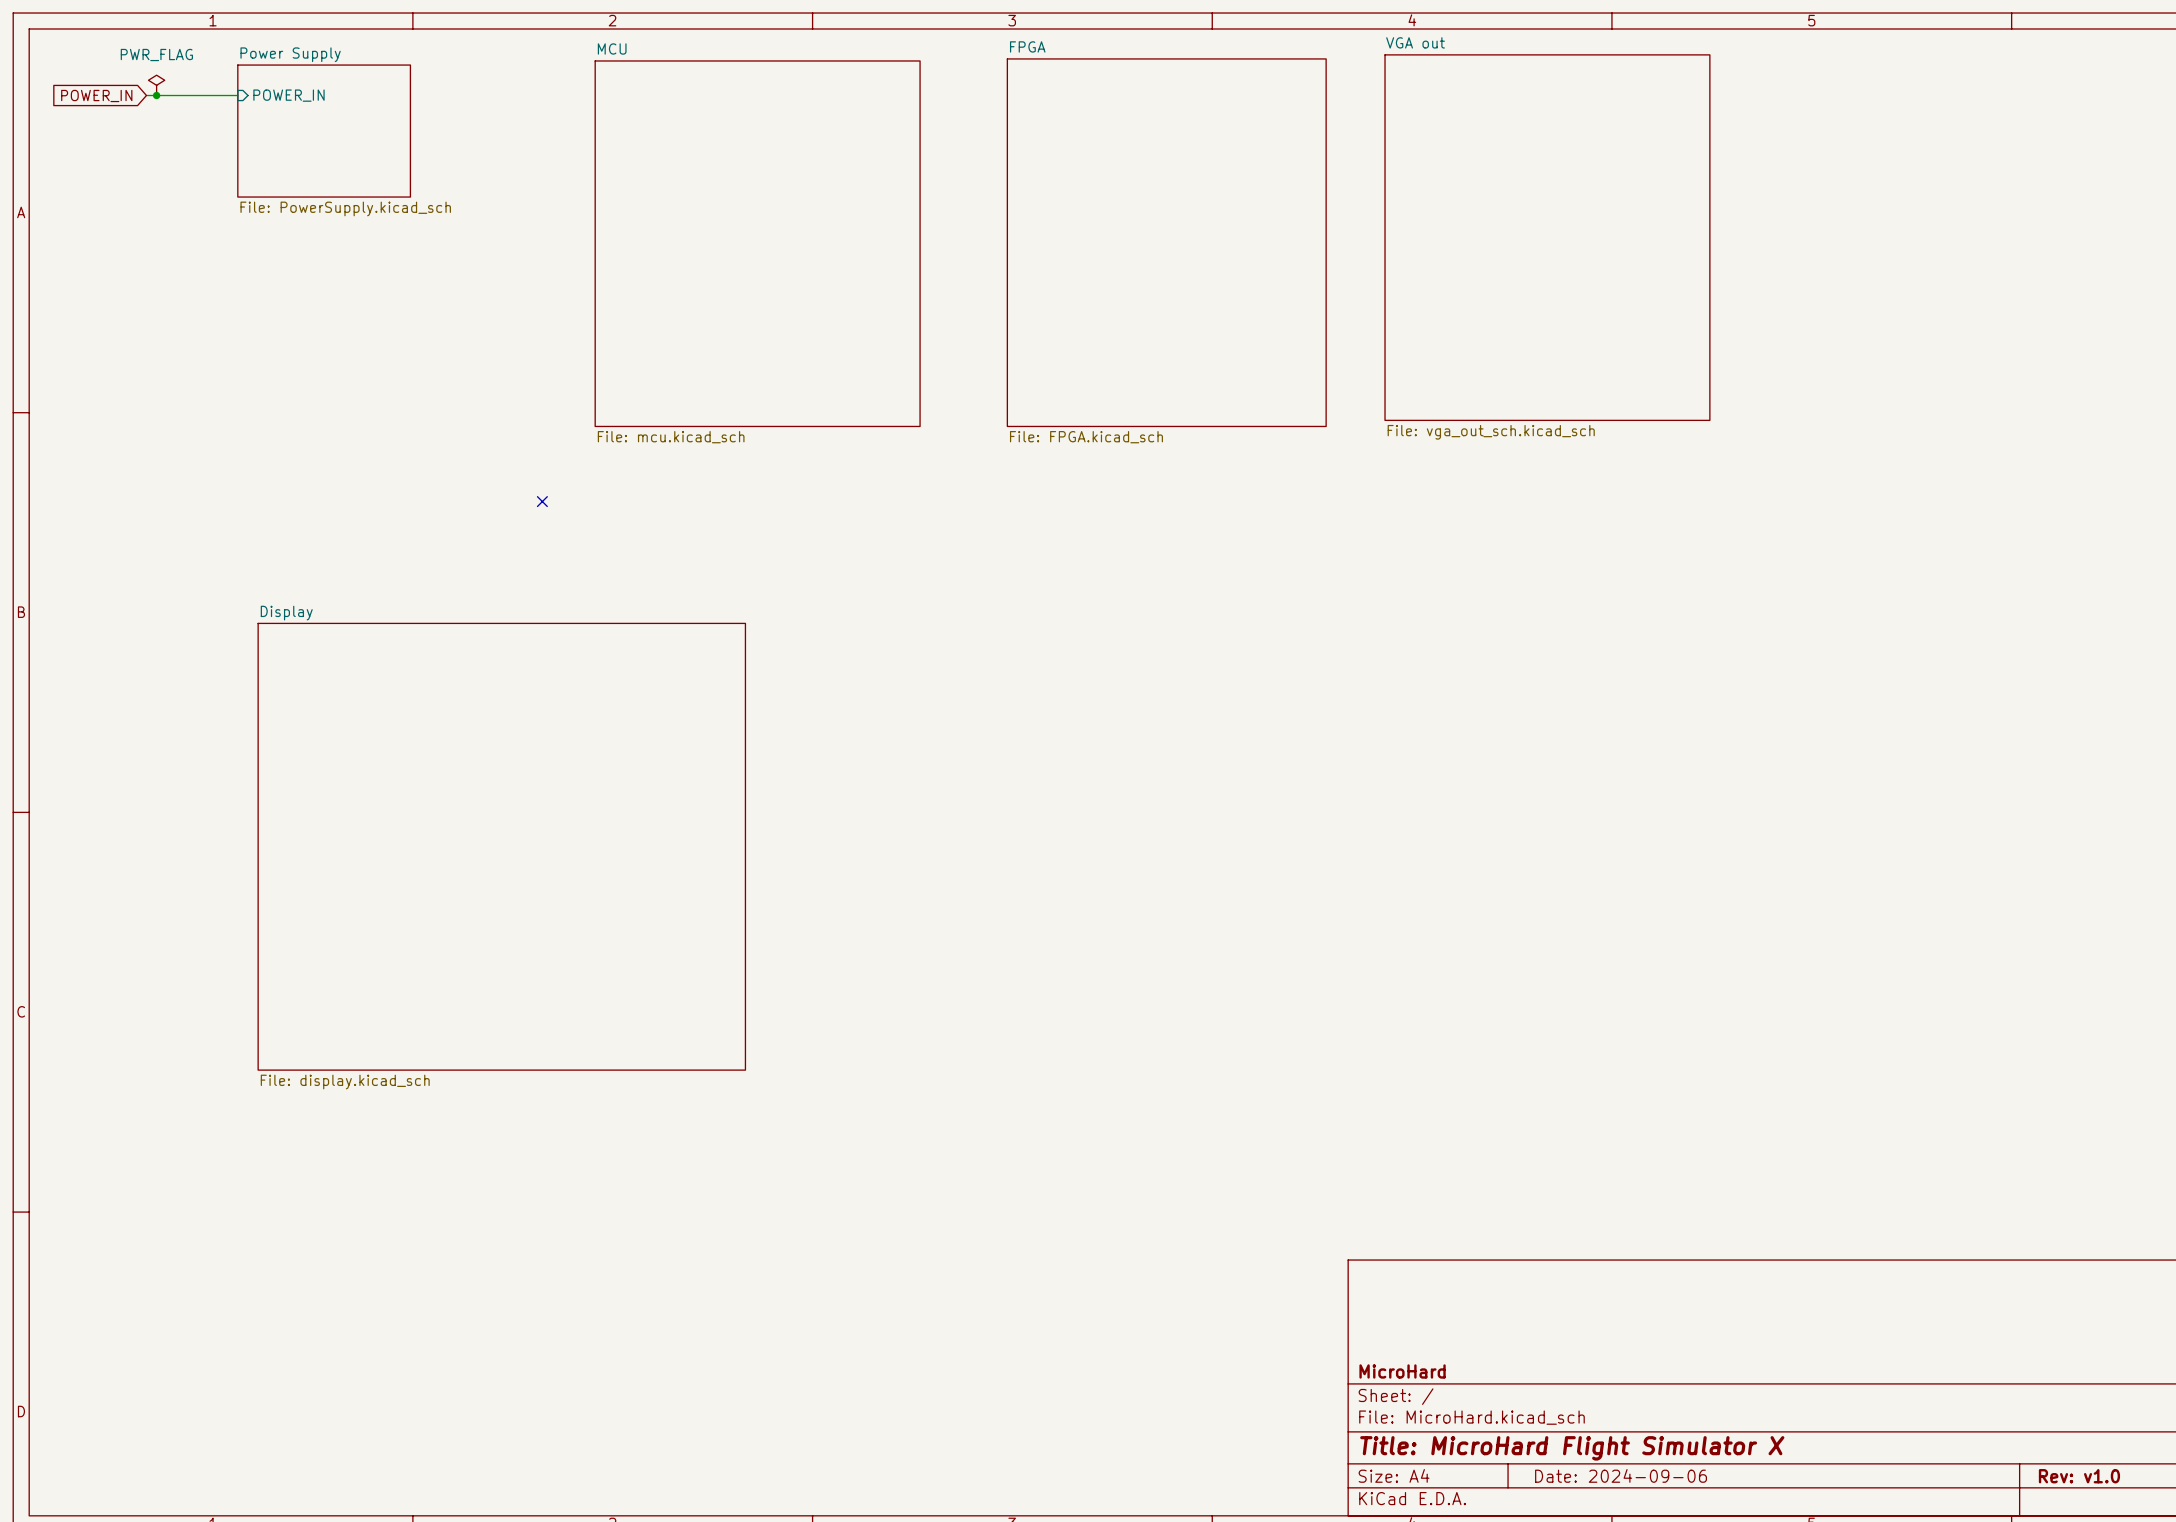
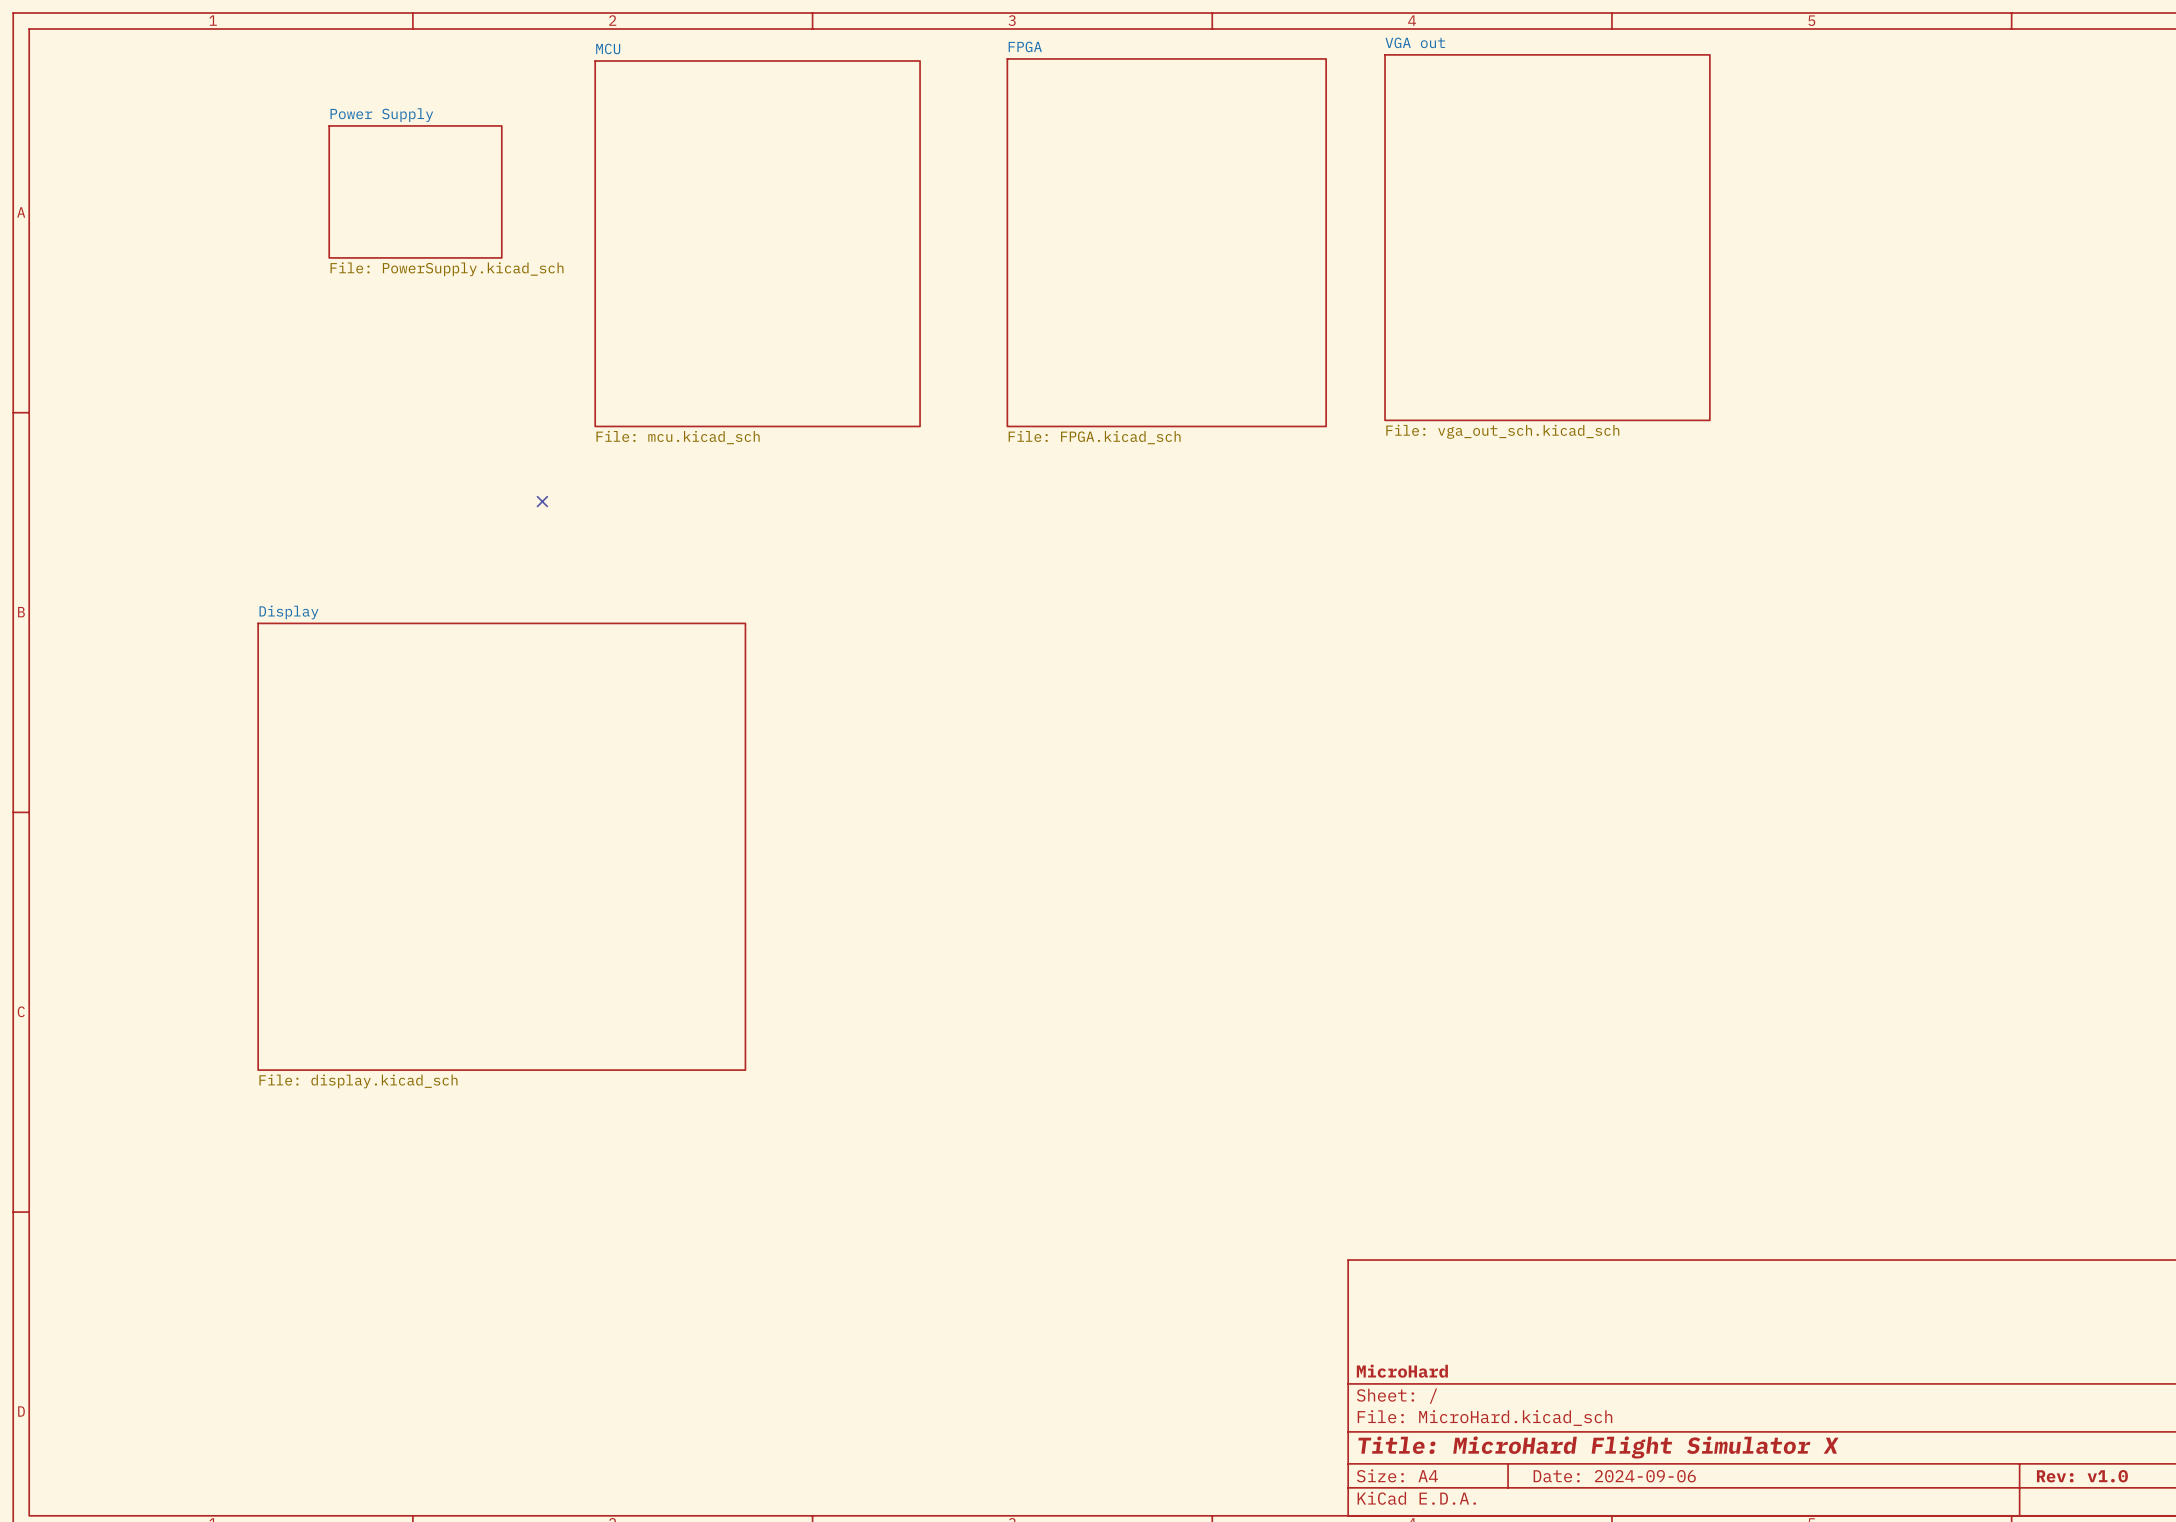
power symbol: PWR_FLAG (156, 85) -> none
global label: POWER_IN (96, 95) -> none
wire: (146, 95) (237, 95) -> none
junction: (156, 95) -> none
sheet pin: POWER_IN (288, 95) -> none
sheet Power Supply position: (324, 131) -> (415, 191)

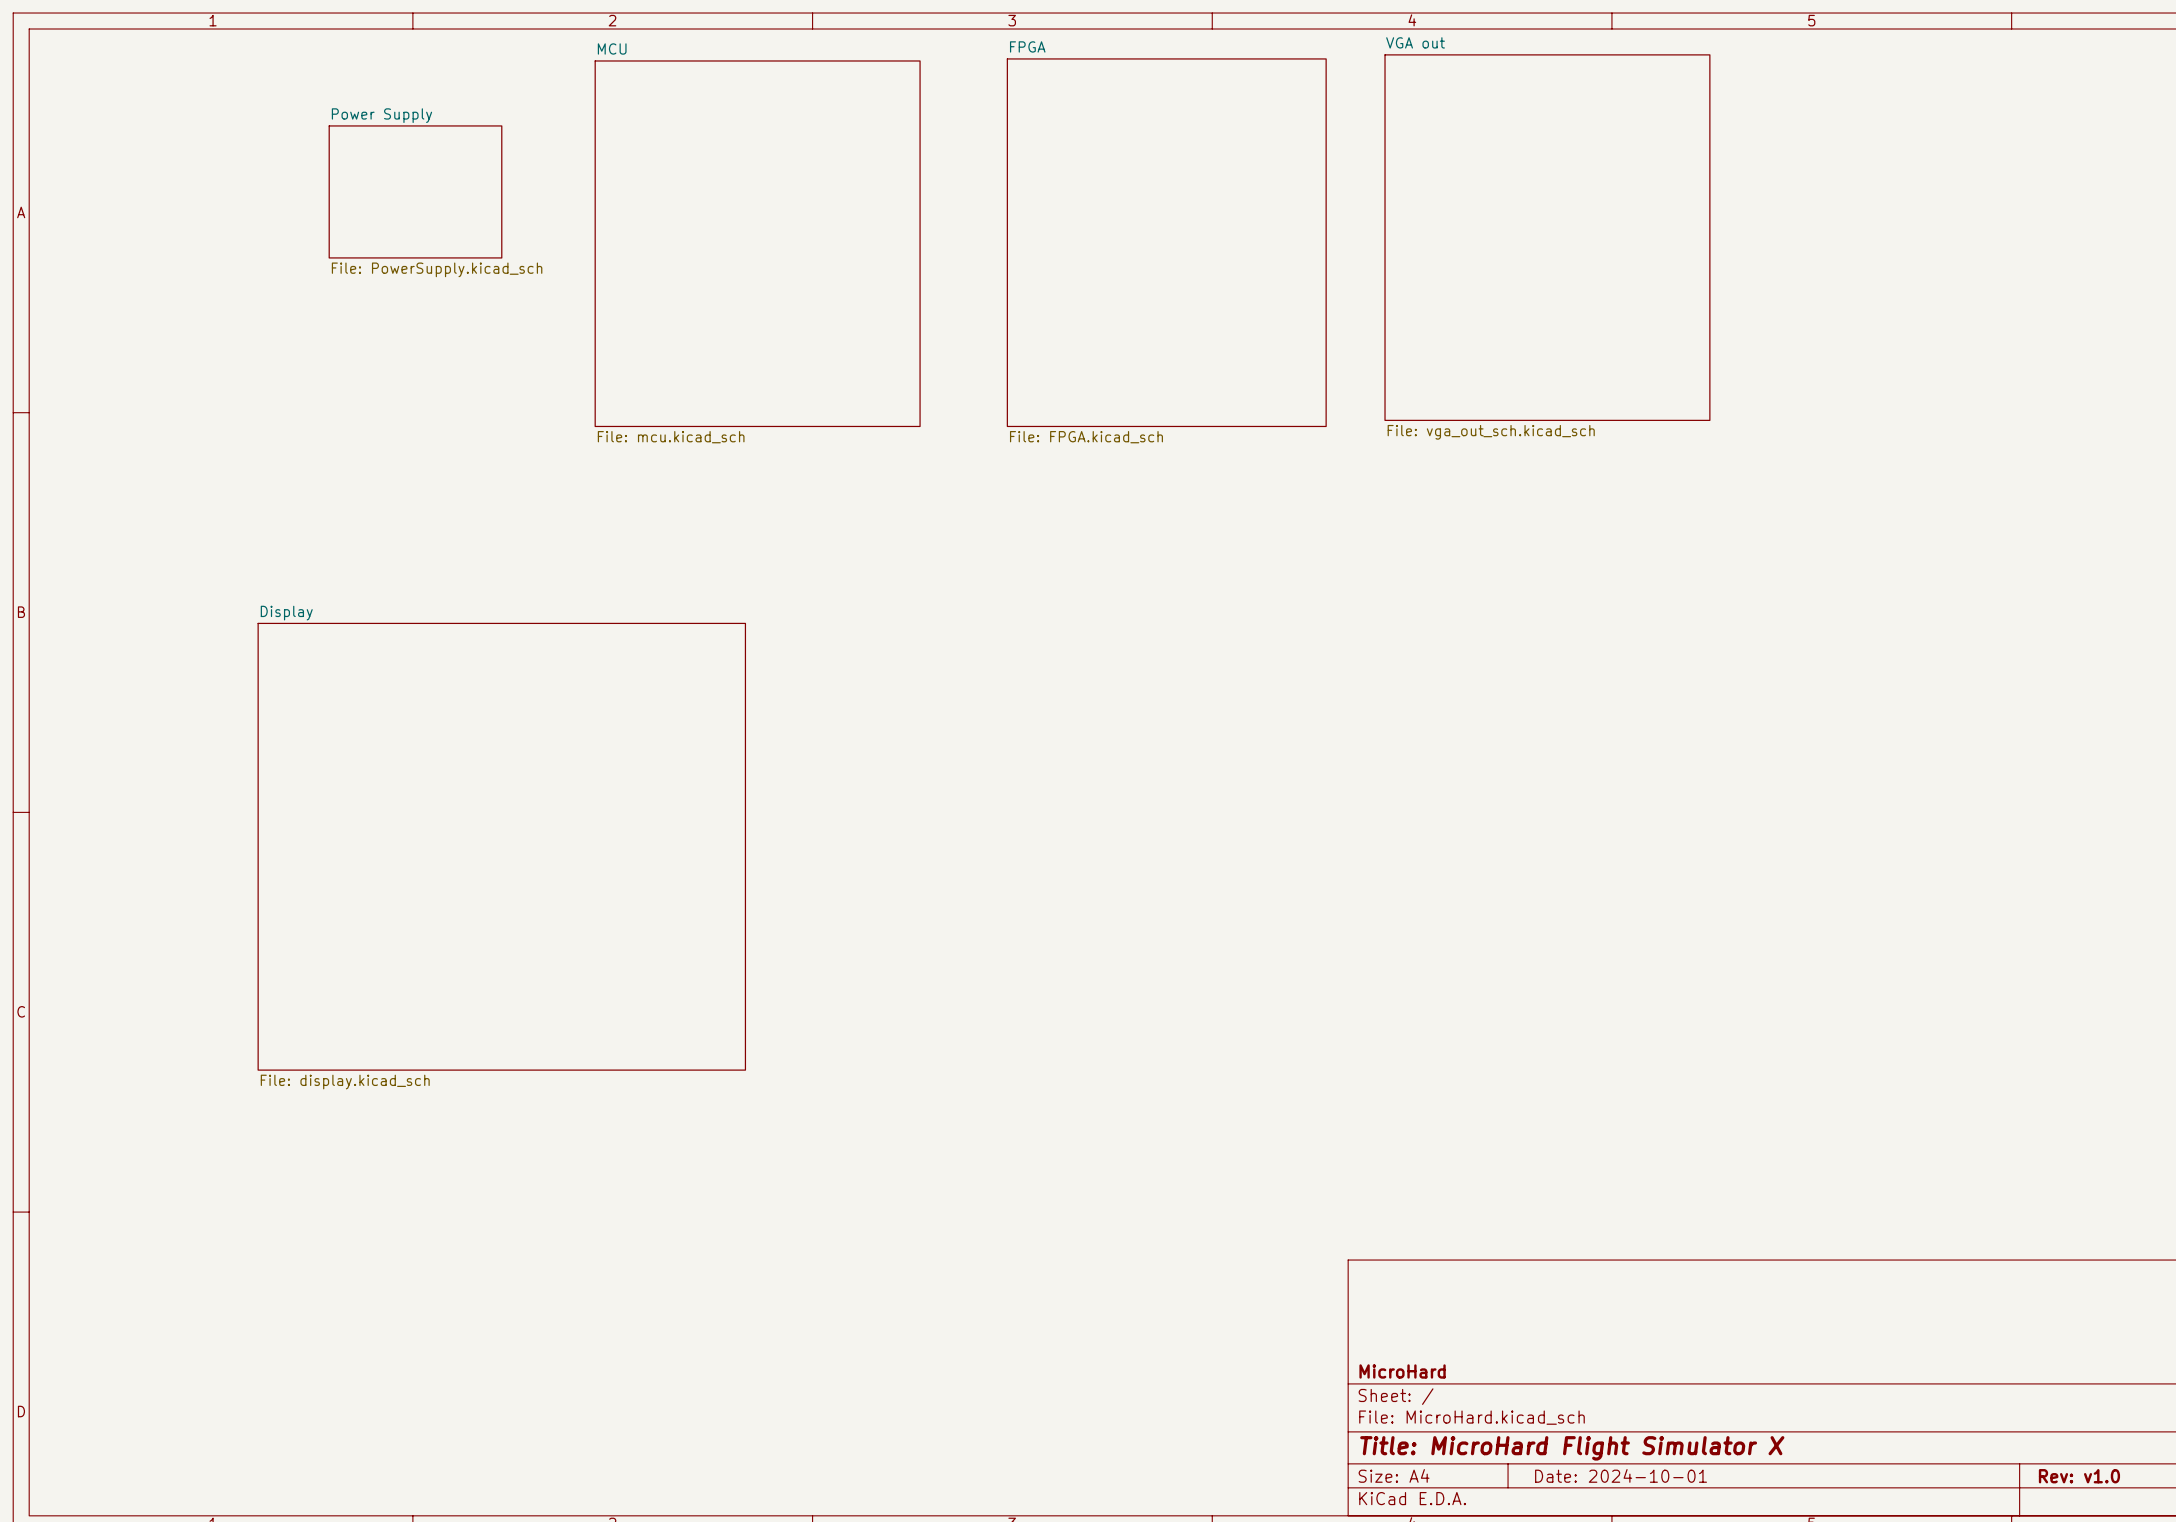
no-connect mark: (542, 501) -> none
title block: Date: 2024-09-06 (1614, 1476) -> Date: 2024-10-01 (1621, 1475)

